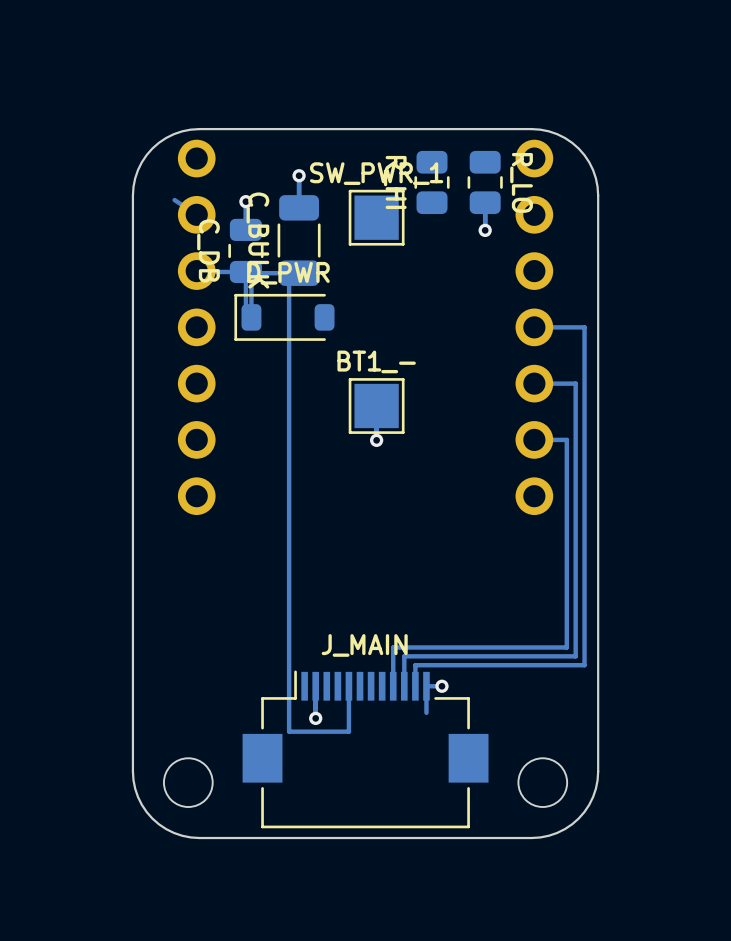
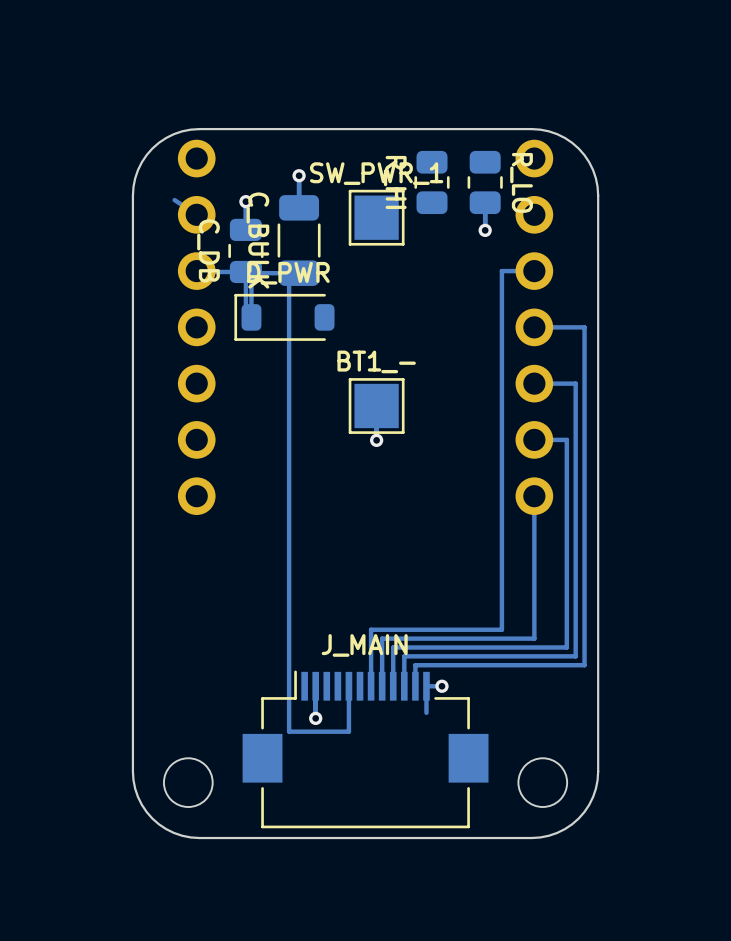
track: none -> (534, 271) (501, 271) (501, 629) (371, 629) (371, 686)
track: none -> (534, 496) (534, 638) (382, 638) (382, 686)

